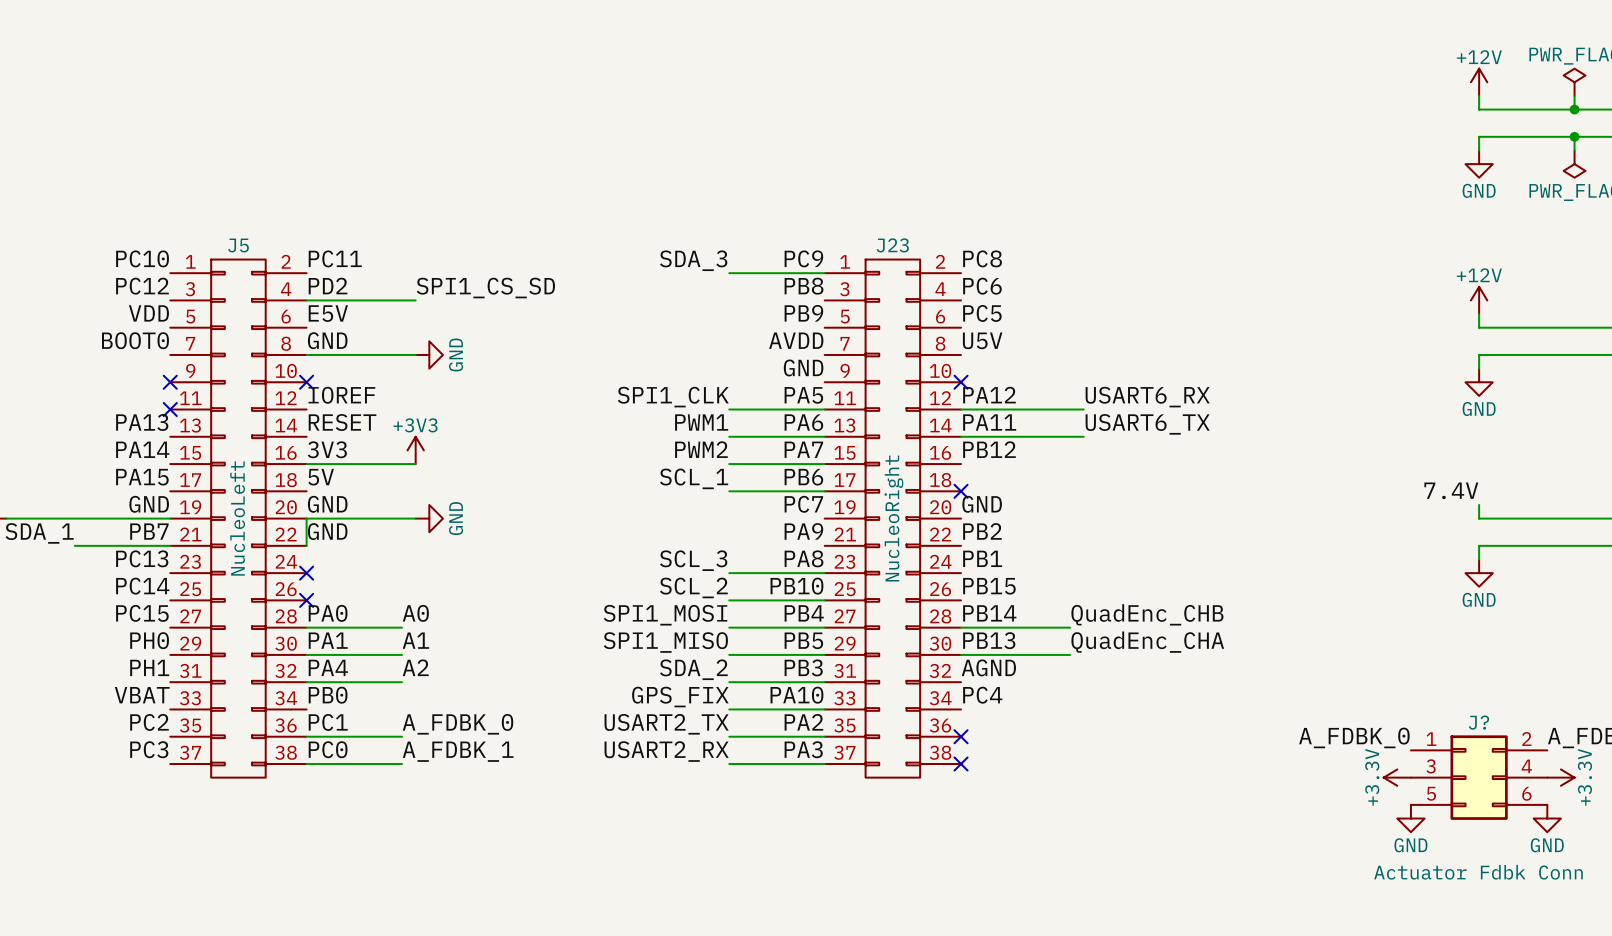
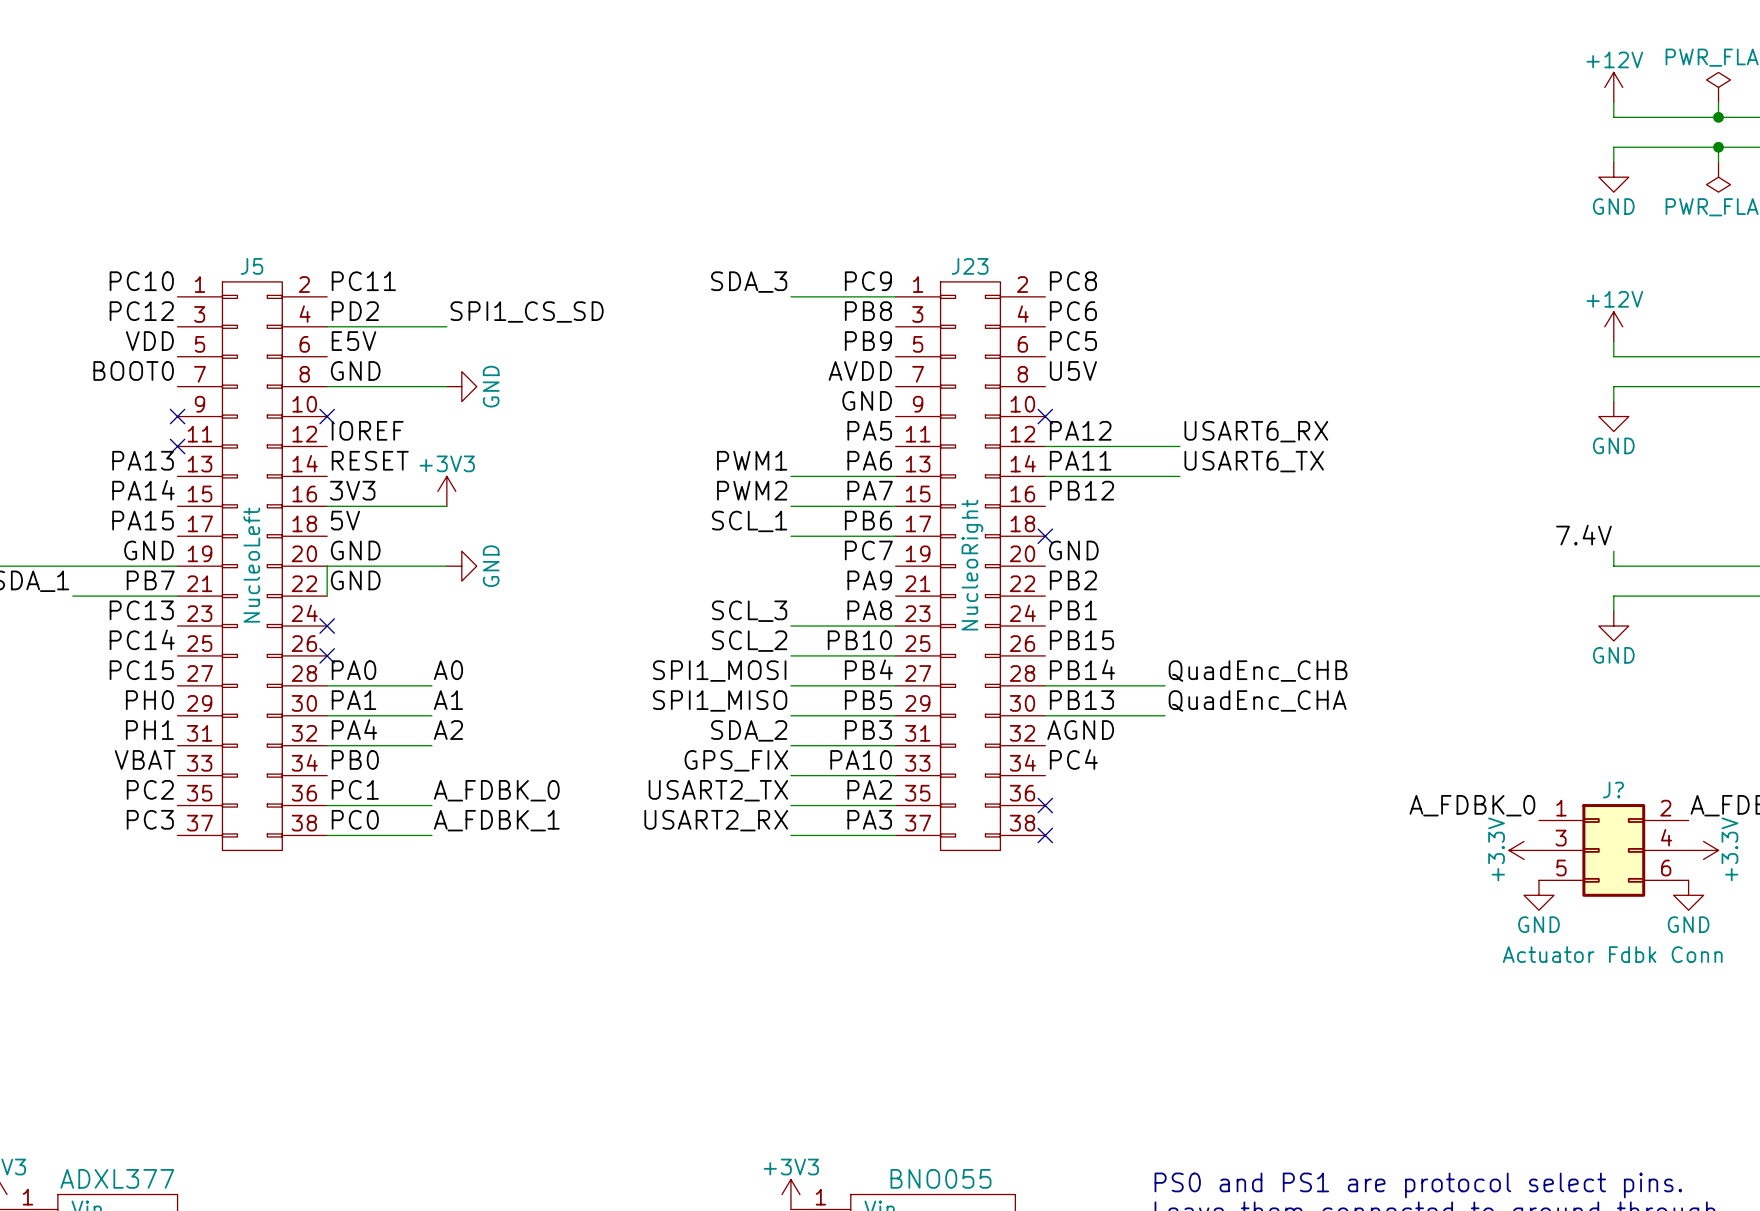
label: SPI1_CLK (673, 397) -> none
wire: (729, 409) (824, 409) -> none

